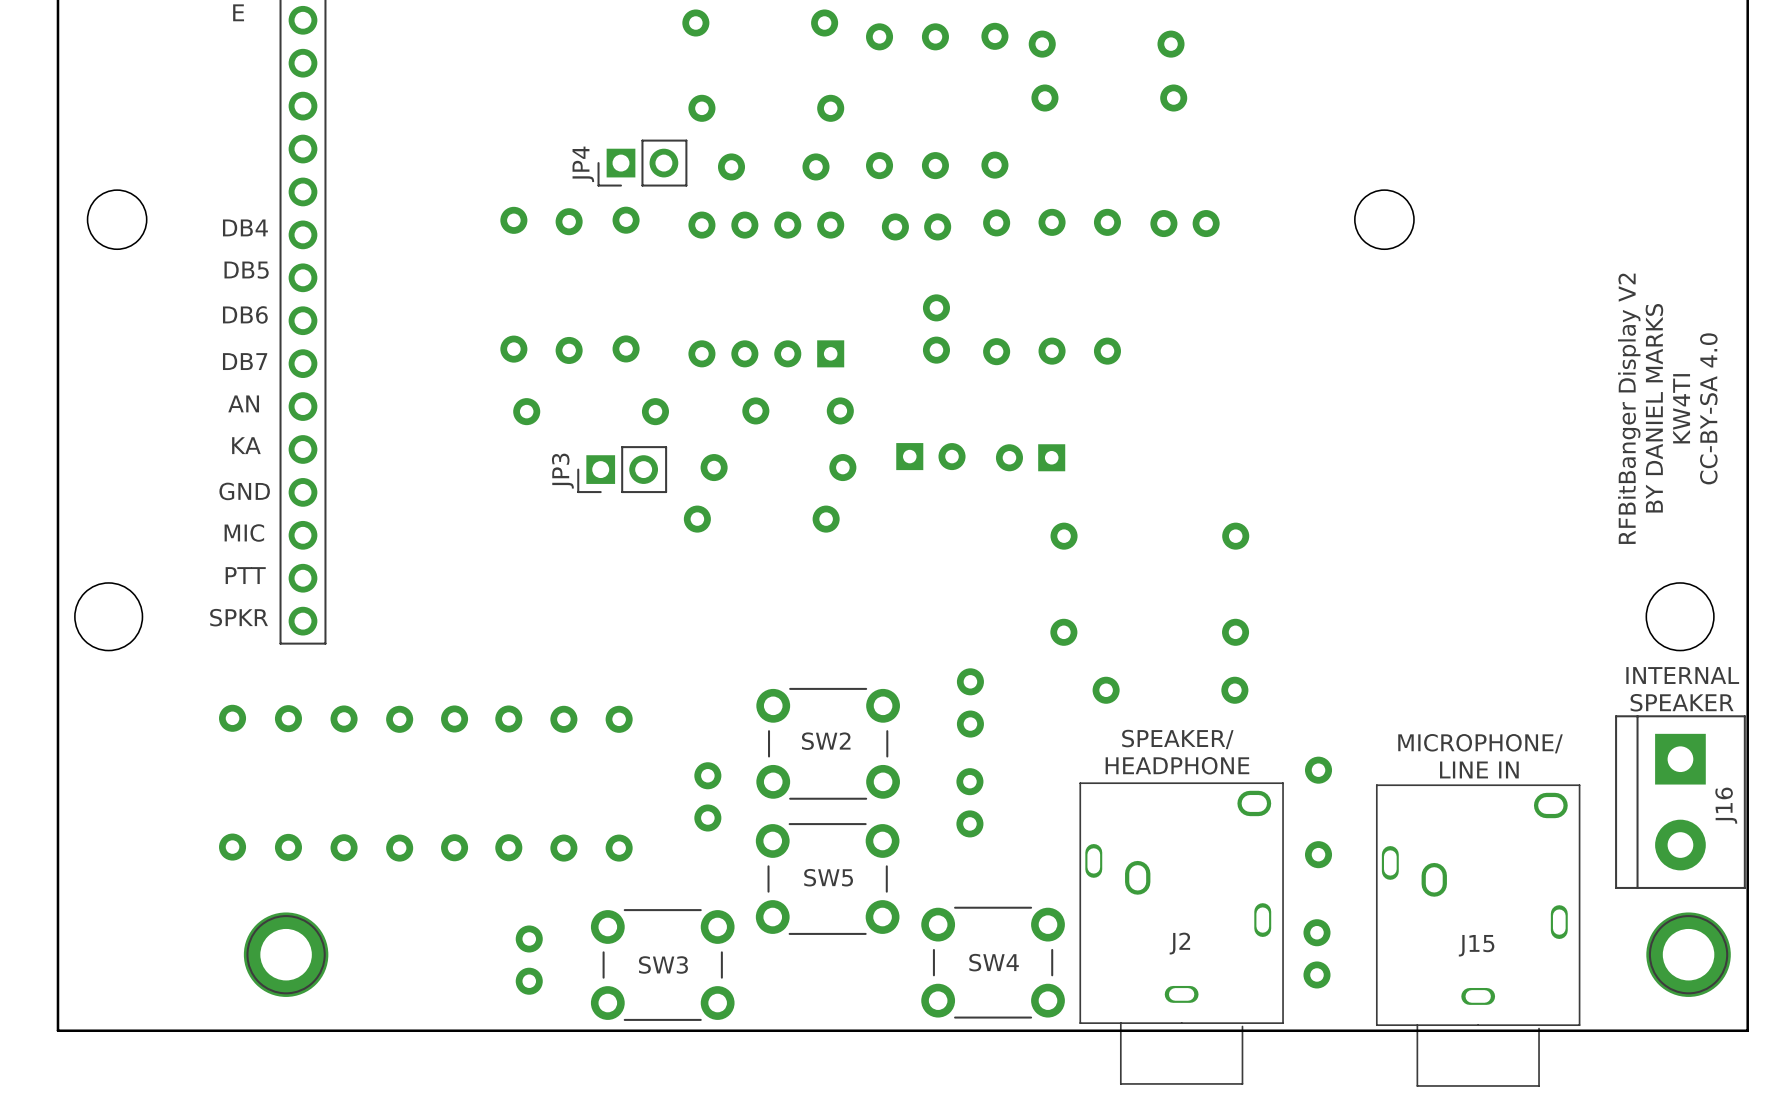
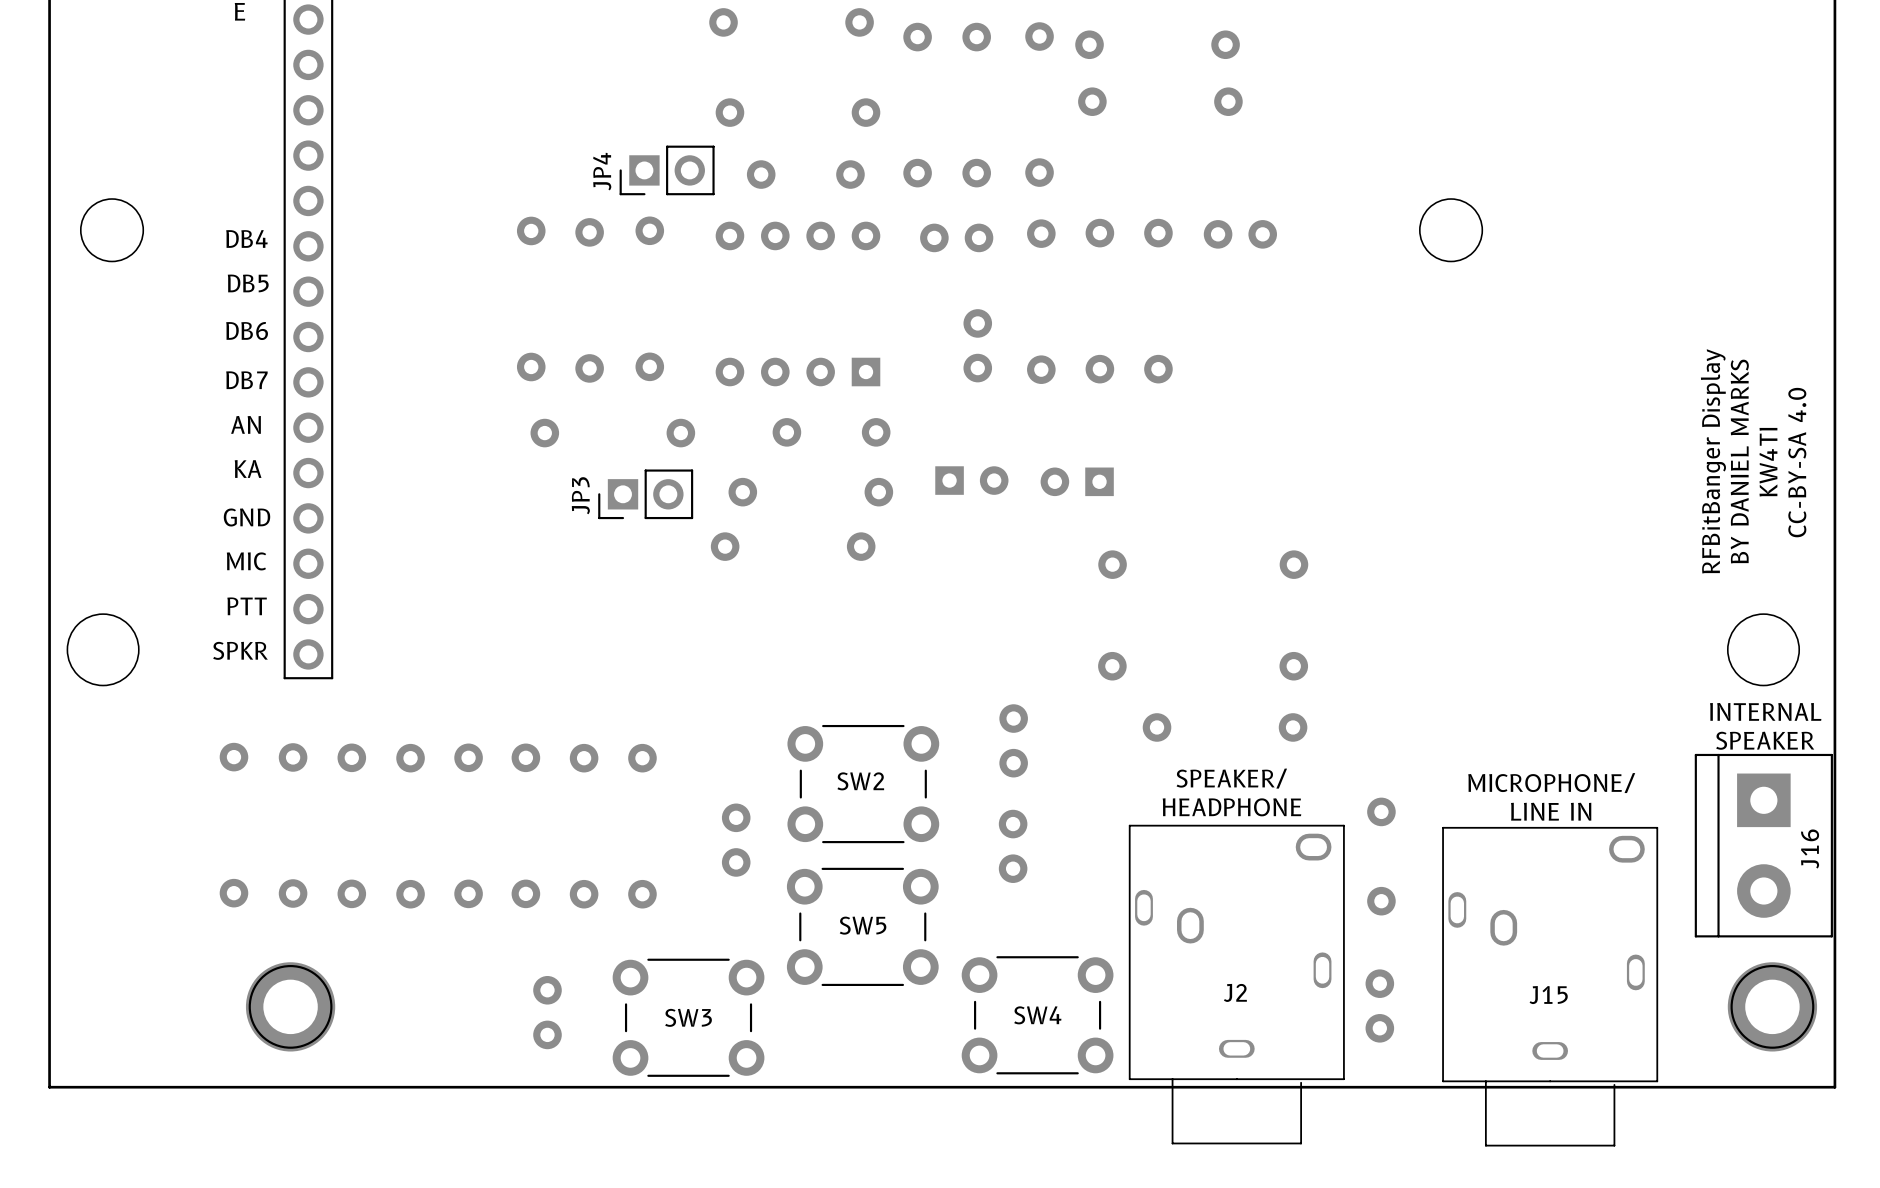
text: RFBitBanger Display V2 (1629, 408) -> RFBitBanger Display (1713, 461)
text position: BY DANIEL MARKS (1654, 408) -> BY DANIEL MARKS (1739, 461)
text position: KW4TI (1681, 408) -> KW4TI (1768, 462)
text position: CC-BY-SA 4.0 (1708, 408) -> CC-BY-SA 4.0 (1797, 462)

